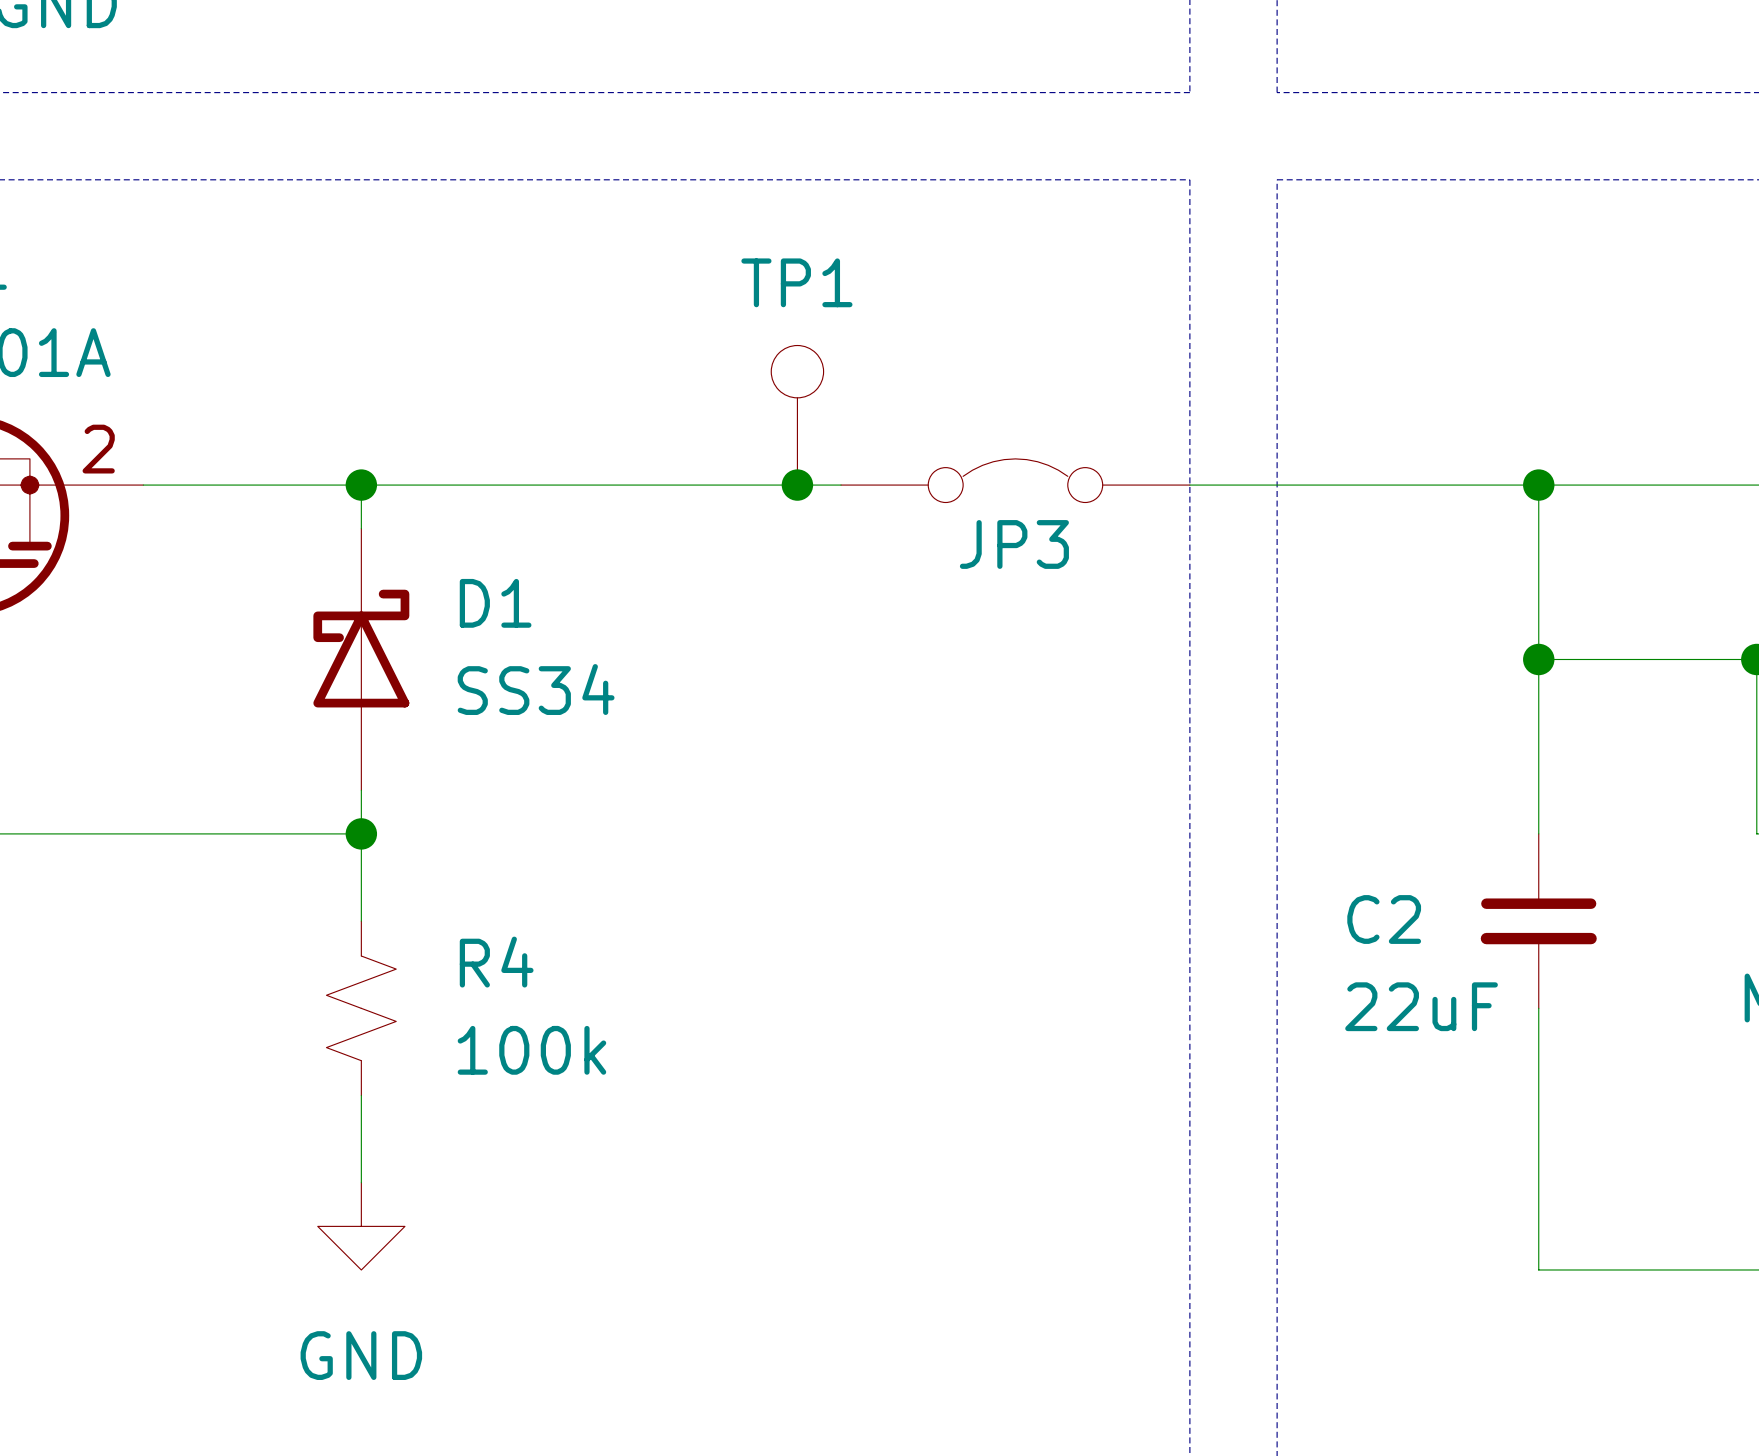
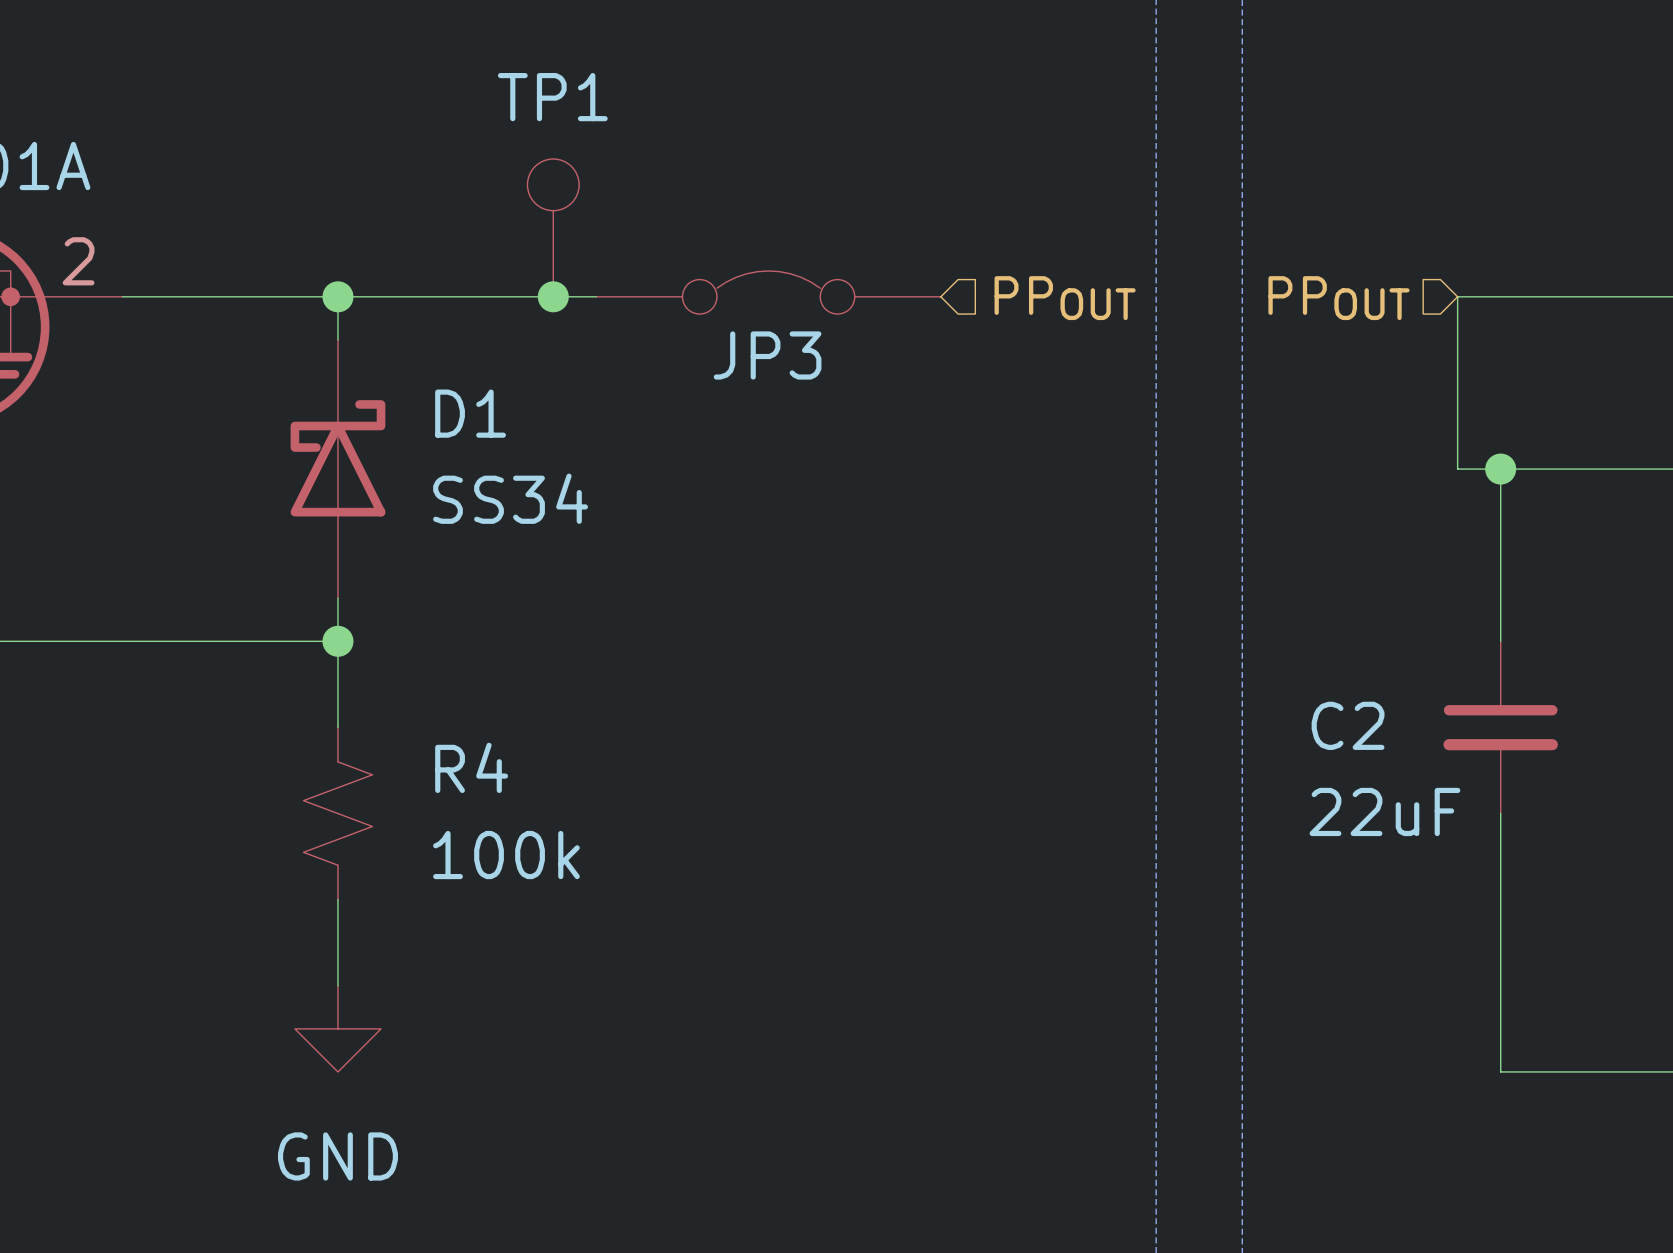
TP1 position: (797, 415) -> (553, 227)
JP3 position: (1015, 480) -> (768, 292)
junction: none -> (553, 296)
wire: (622, 485) (841, 485) -> none
junction: (797, 485) -> none
wire: (1189, 485) (1495, 485) -> none
wire: (1538, 485) (1538, 659) -> (1457, 296) (1457, 469) (1500, 469)
junction: (1538, 485) -> none
hierarchical label: none -> PPOUT (1065, 298)
hierarchical label: none -> PPOUT (1338, 298)

